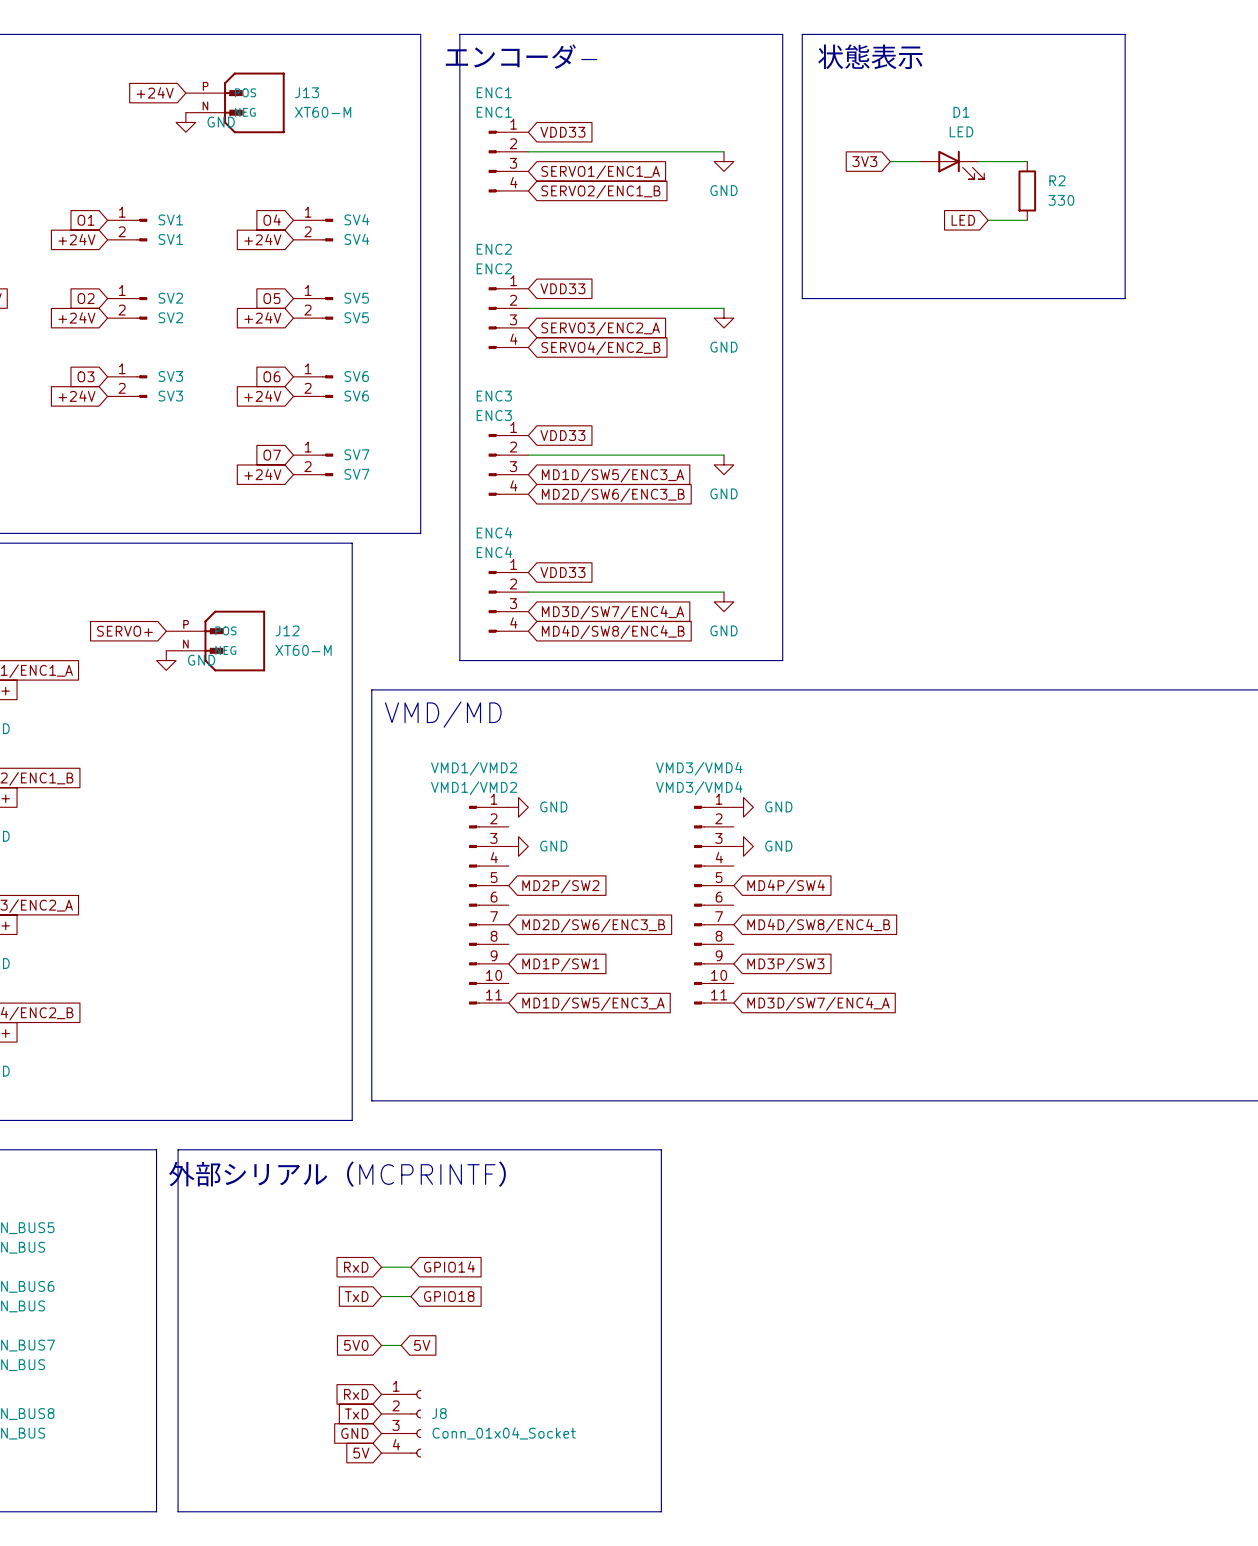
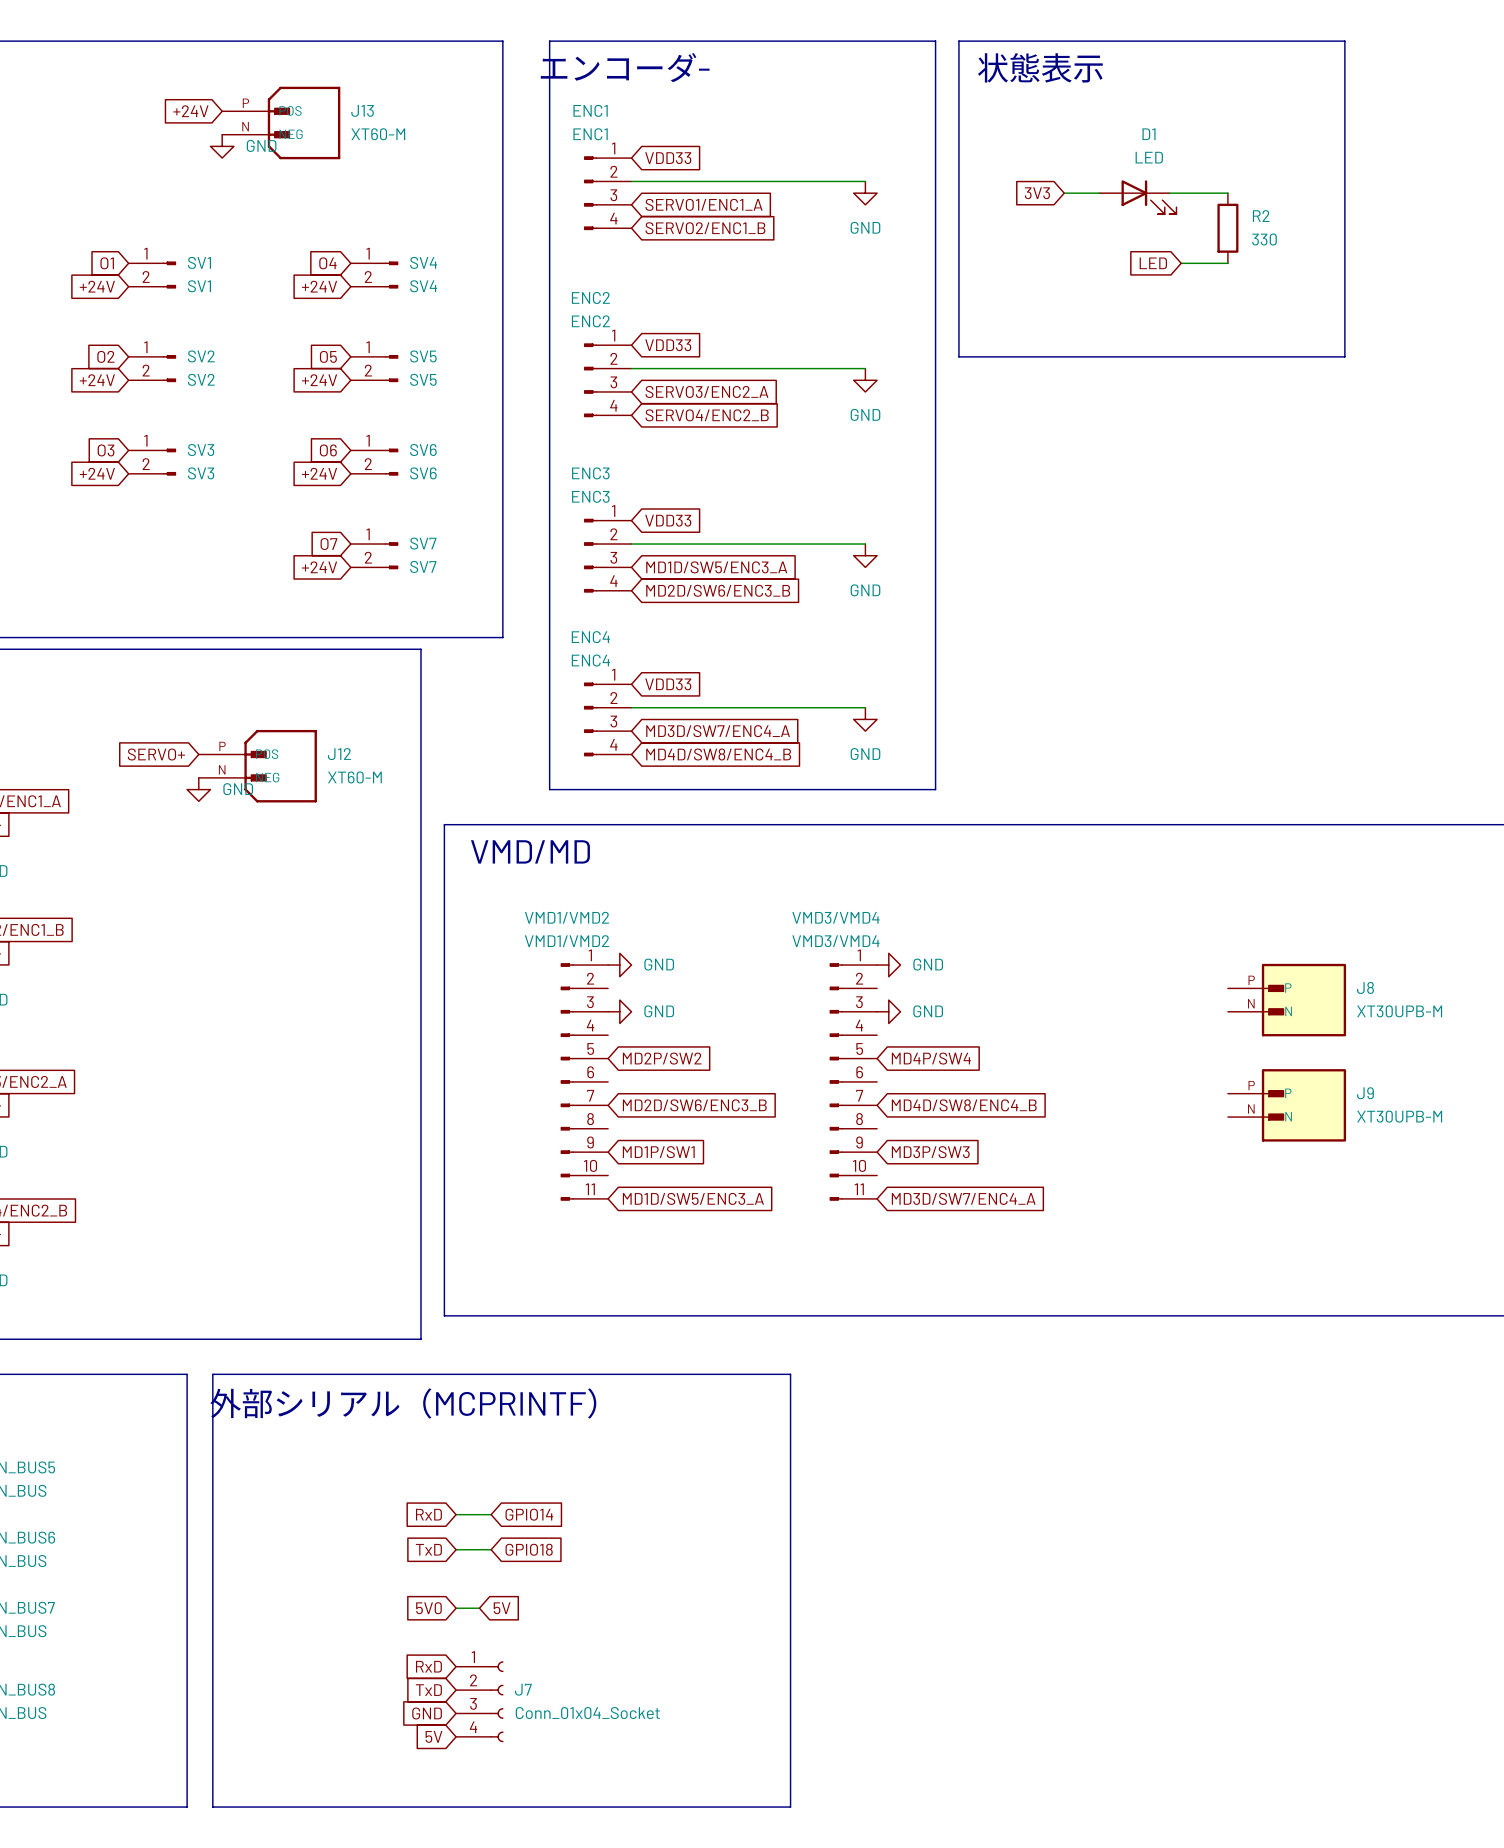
J8: none -> XT30UPB-M (1286, 1000)
J9: none -> XT30UPB-M (1286, 1105)
J8 name: J8 (439, 1413) -> J7 (523, 1689)

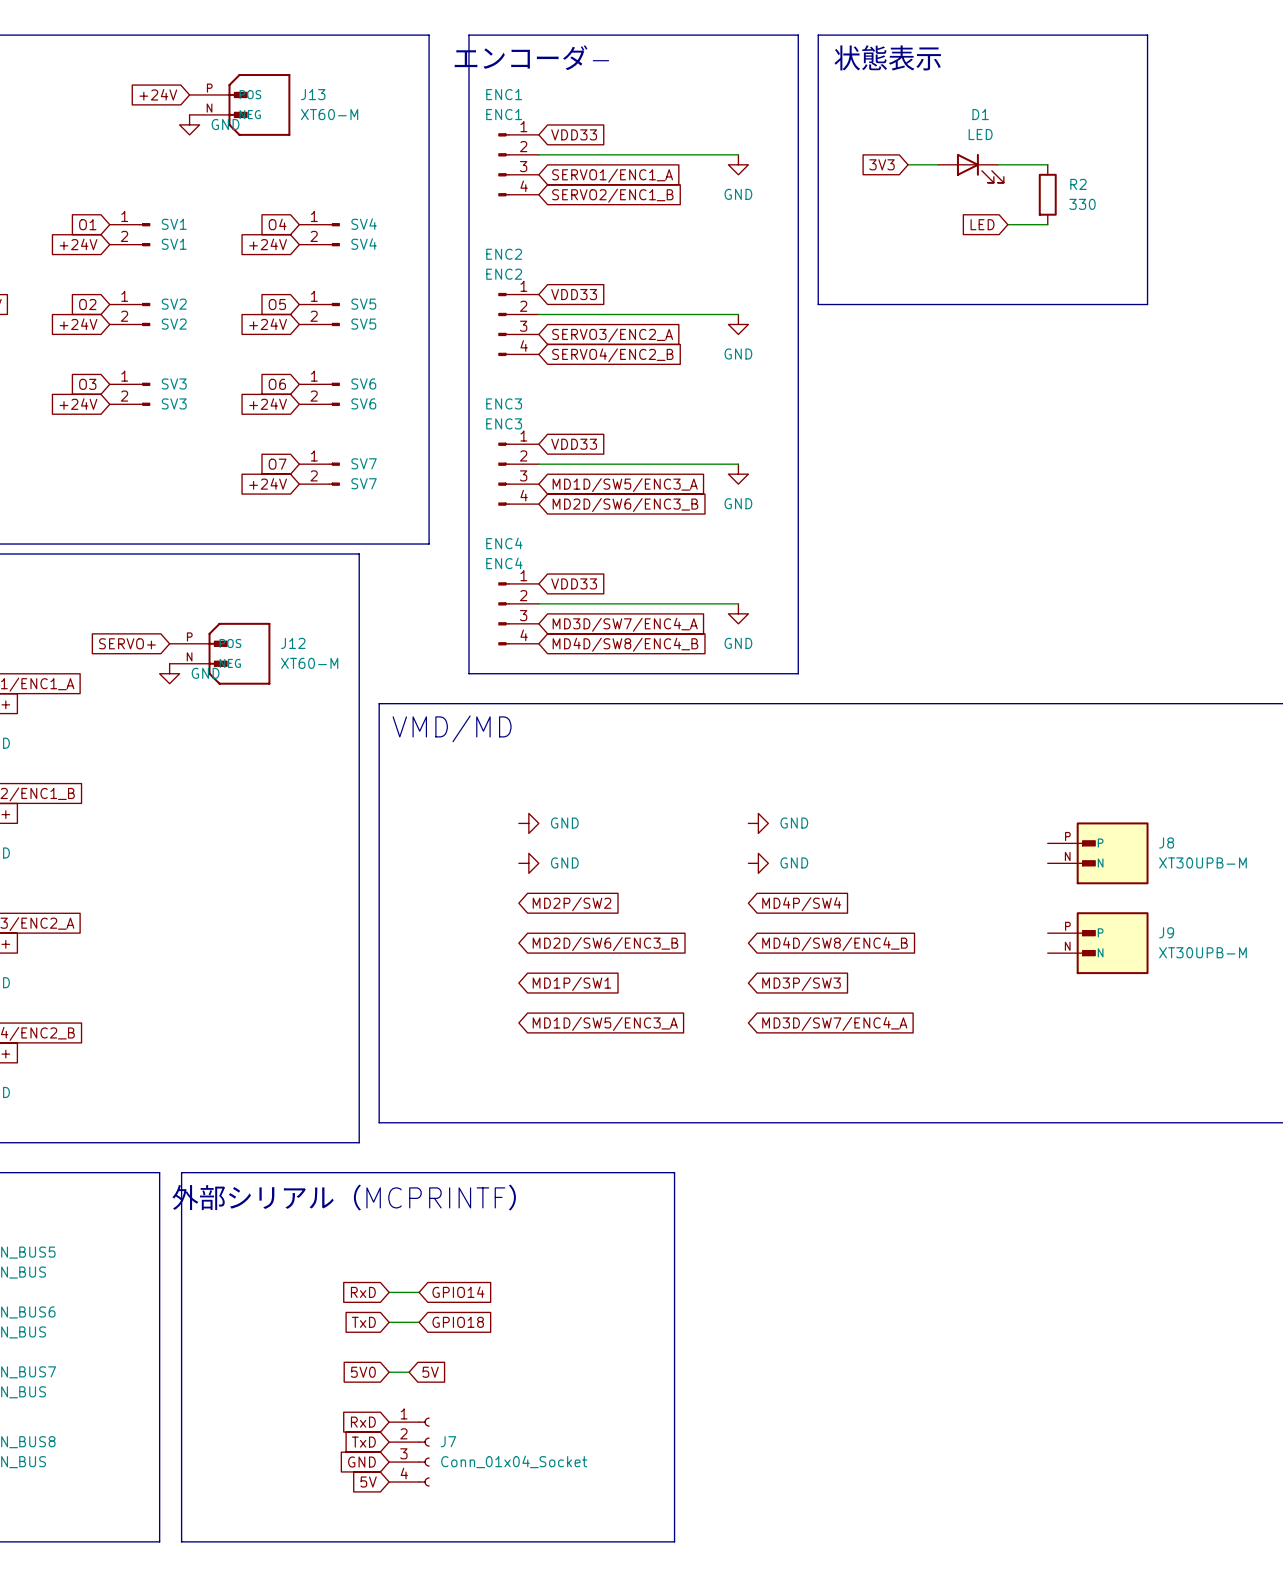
VMD1/VMD2: VMD1/VMD2 (584, 1081) -> none
VMD3/VMD4: VMD3/VMD4 (853, 1081) -> none

